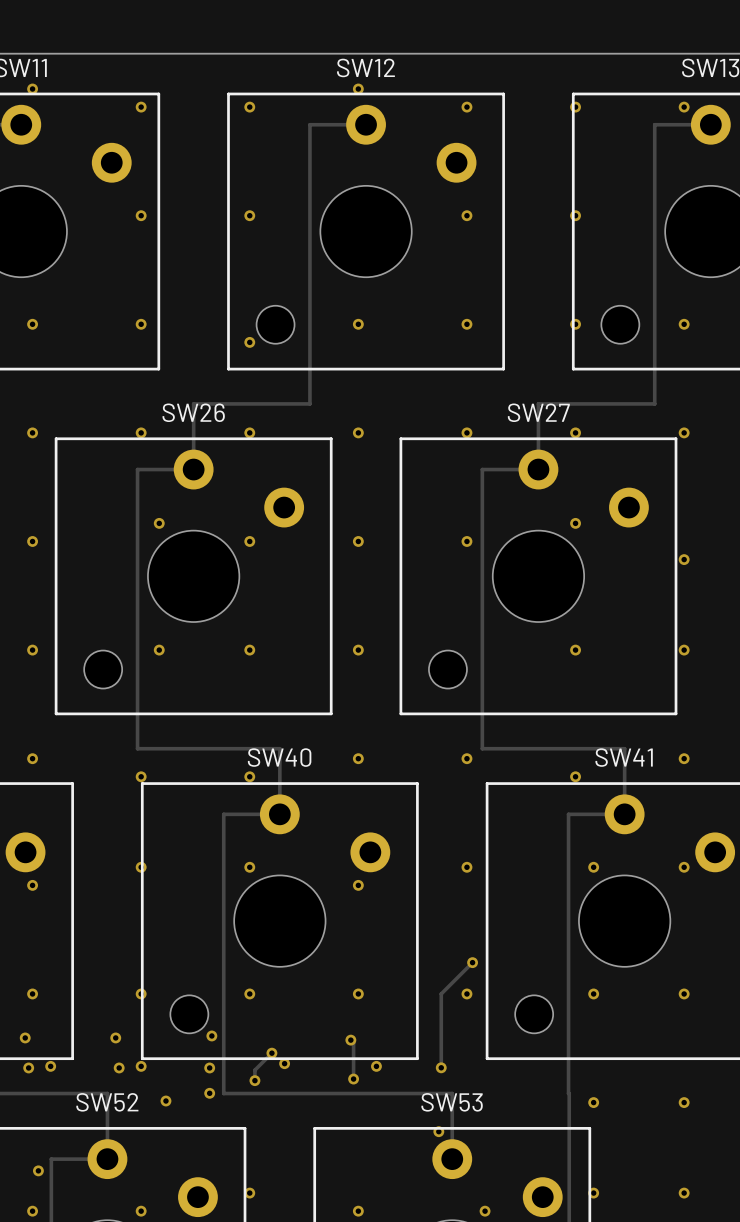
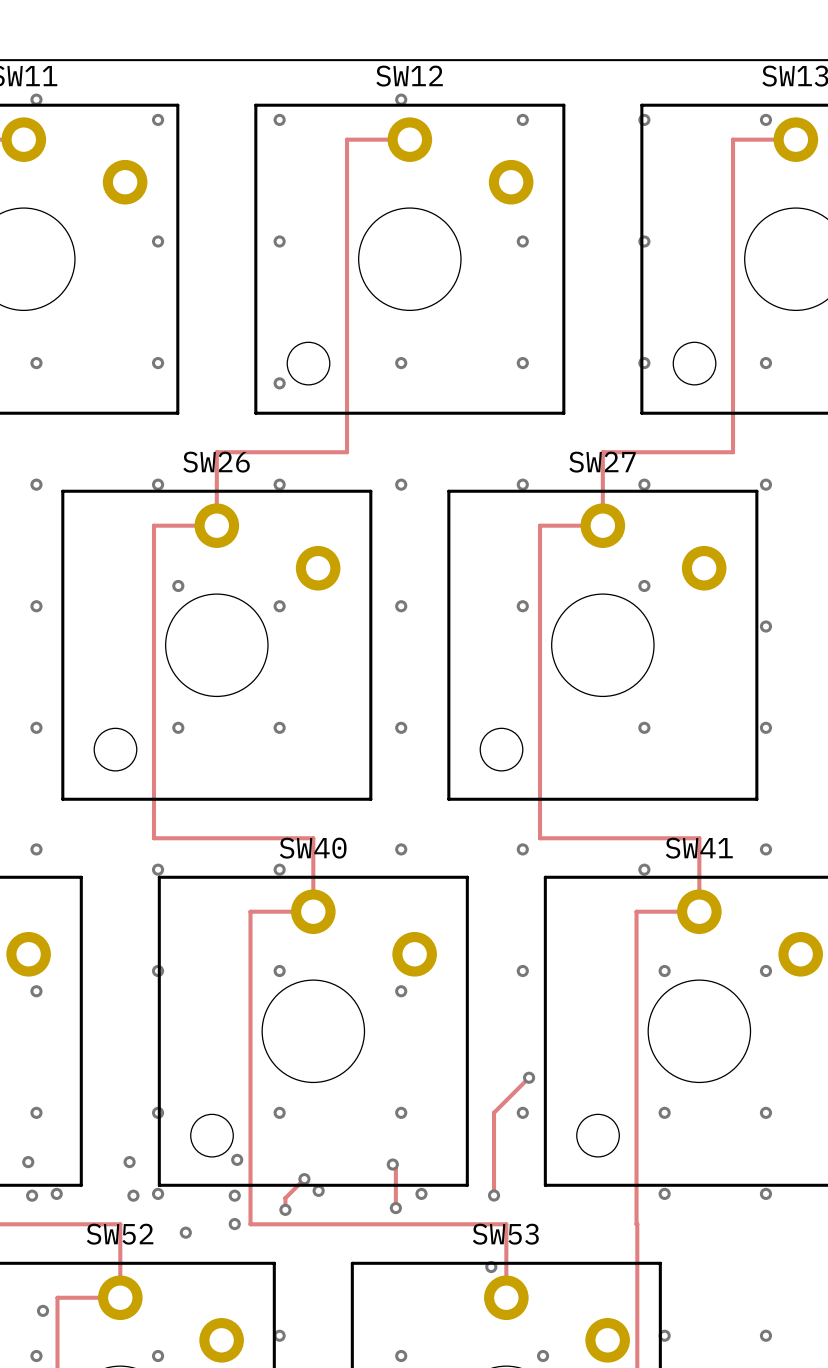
via position: (593, 1102) -> (664, 1193)
via position: (684, 1102) -> (765, 1193)

